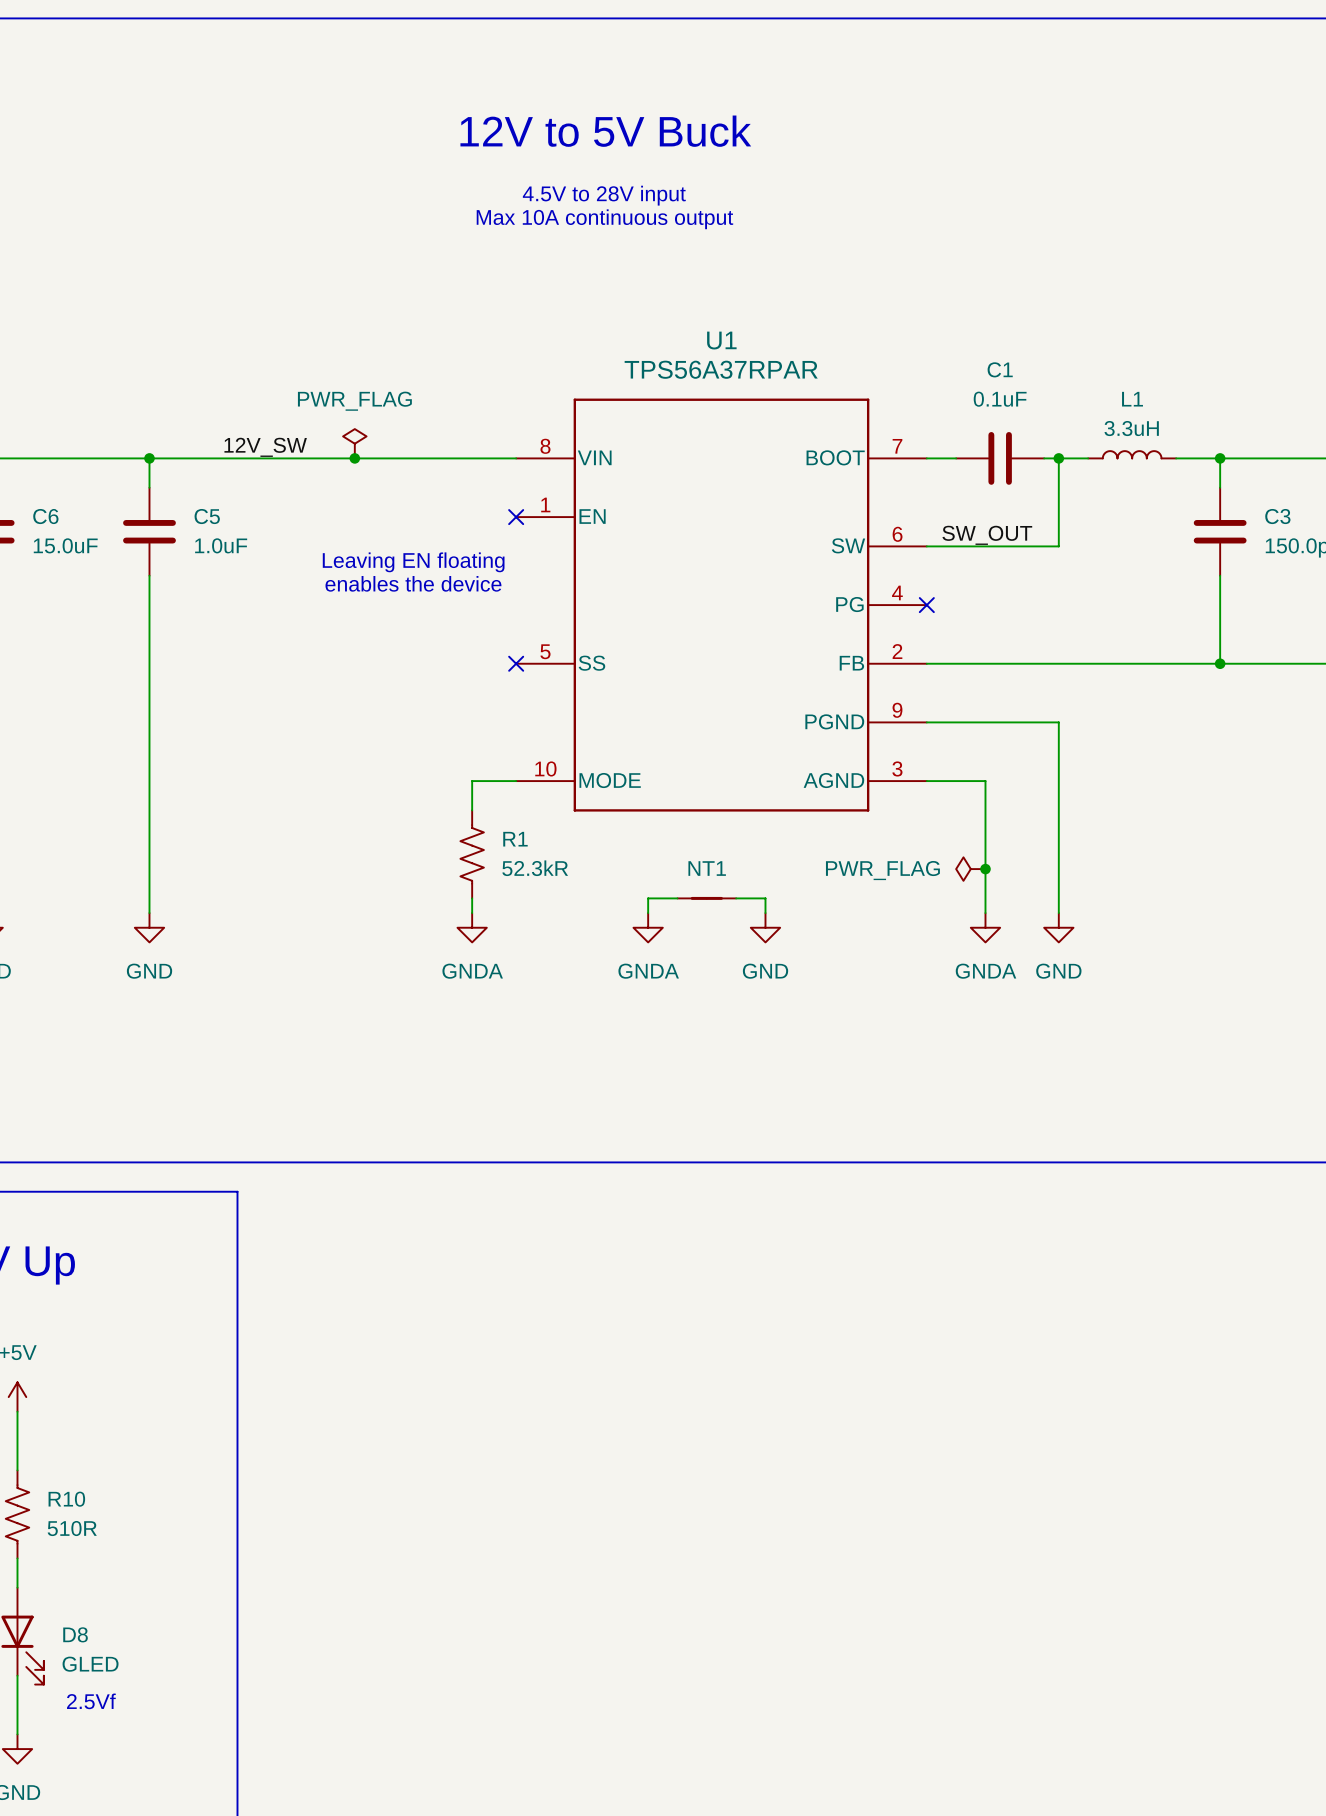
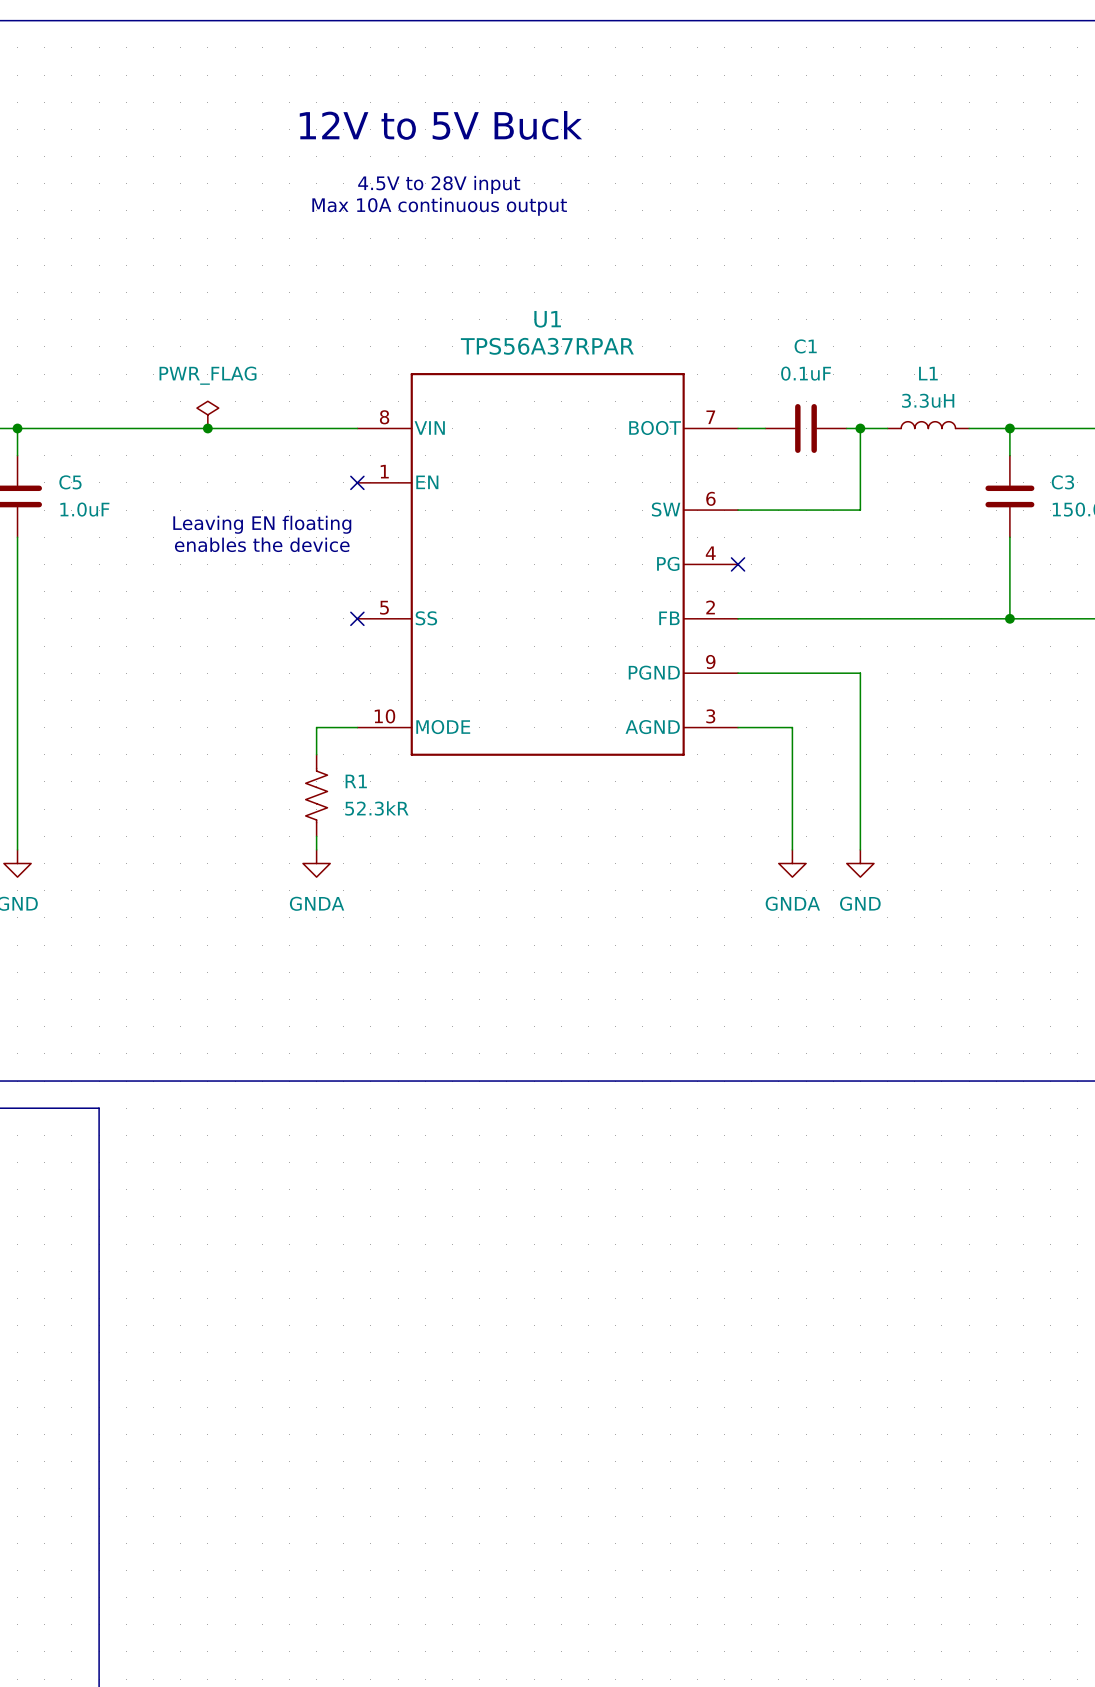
label: 12V_SW (265, 447) -> none
label: SW_OUT (987, 535) -> none
power symbol: PWR_FLAG (970, 869) -> none
junction: (985, 869) -> none
wire: (677, 898) (648, 898) (648, 913) -> none
NT1: (706, 898) -> none
wire: (736, 898) (765, 898) (765, 913) -> none
power symbol: GNDA (648, 927) -> none
power symbol: GND (765, 927) -> none

